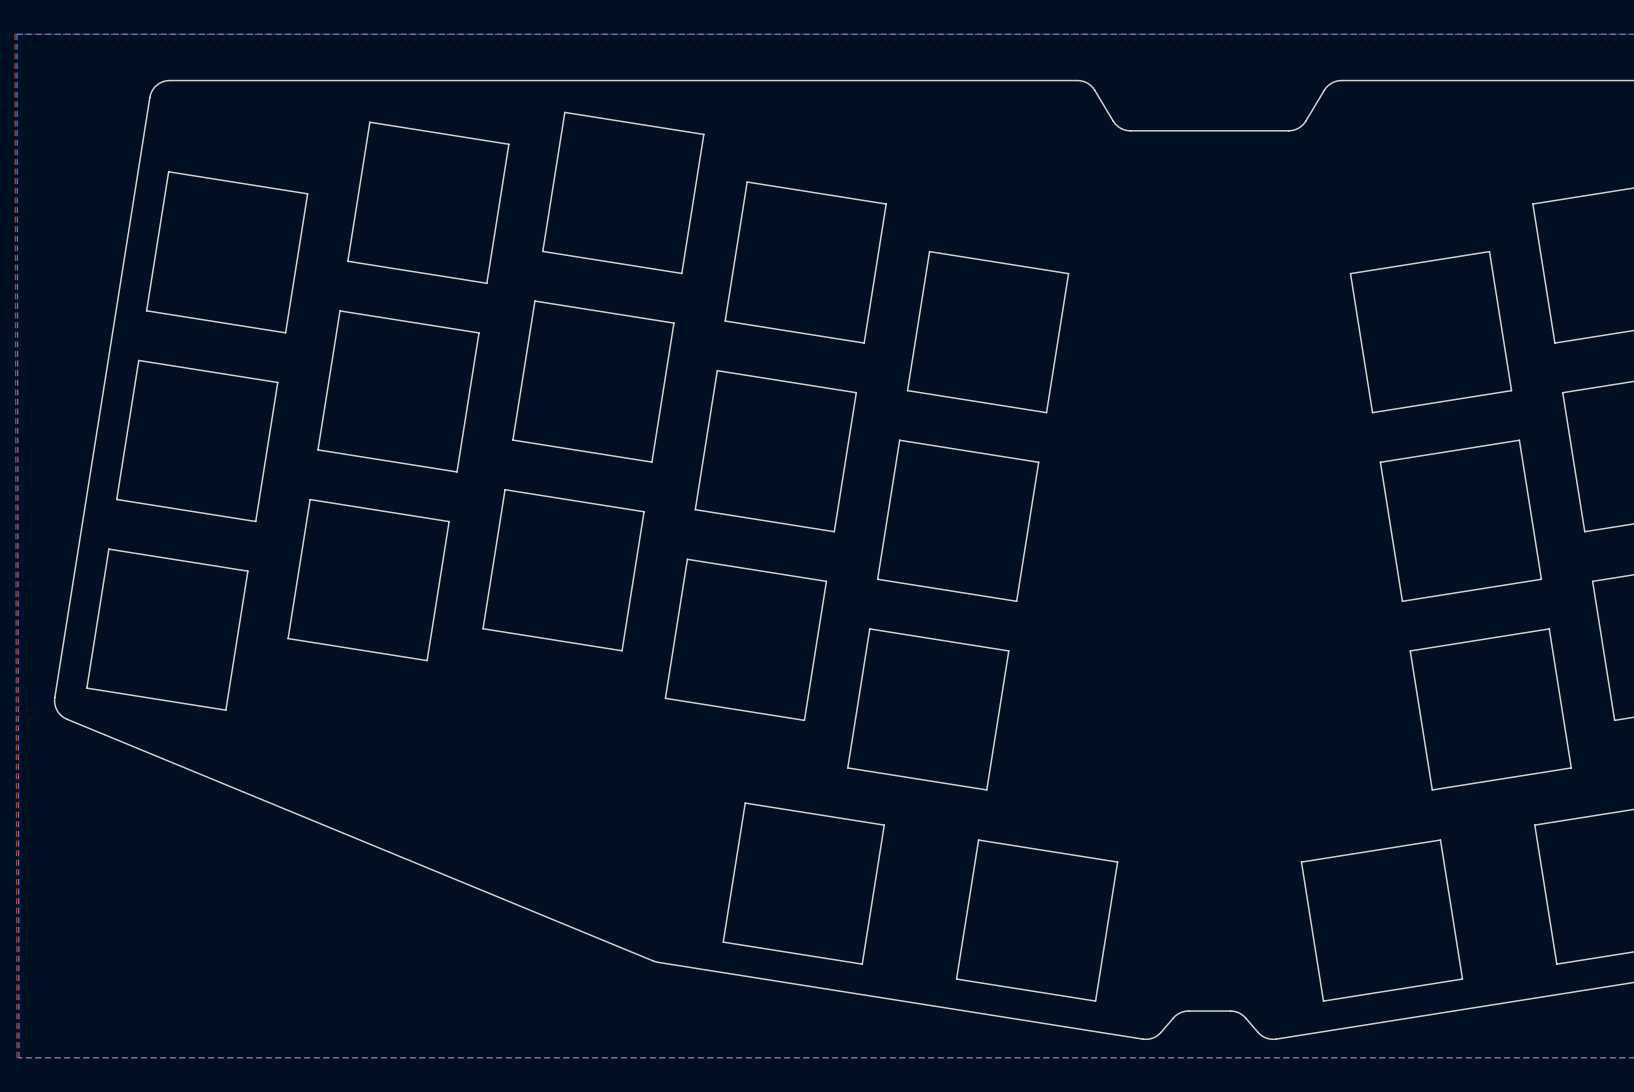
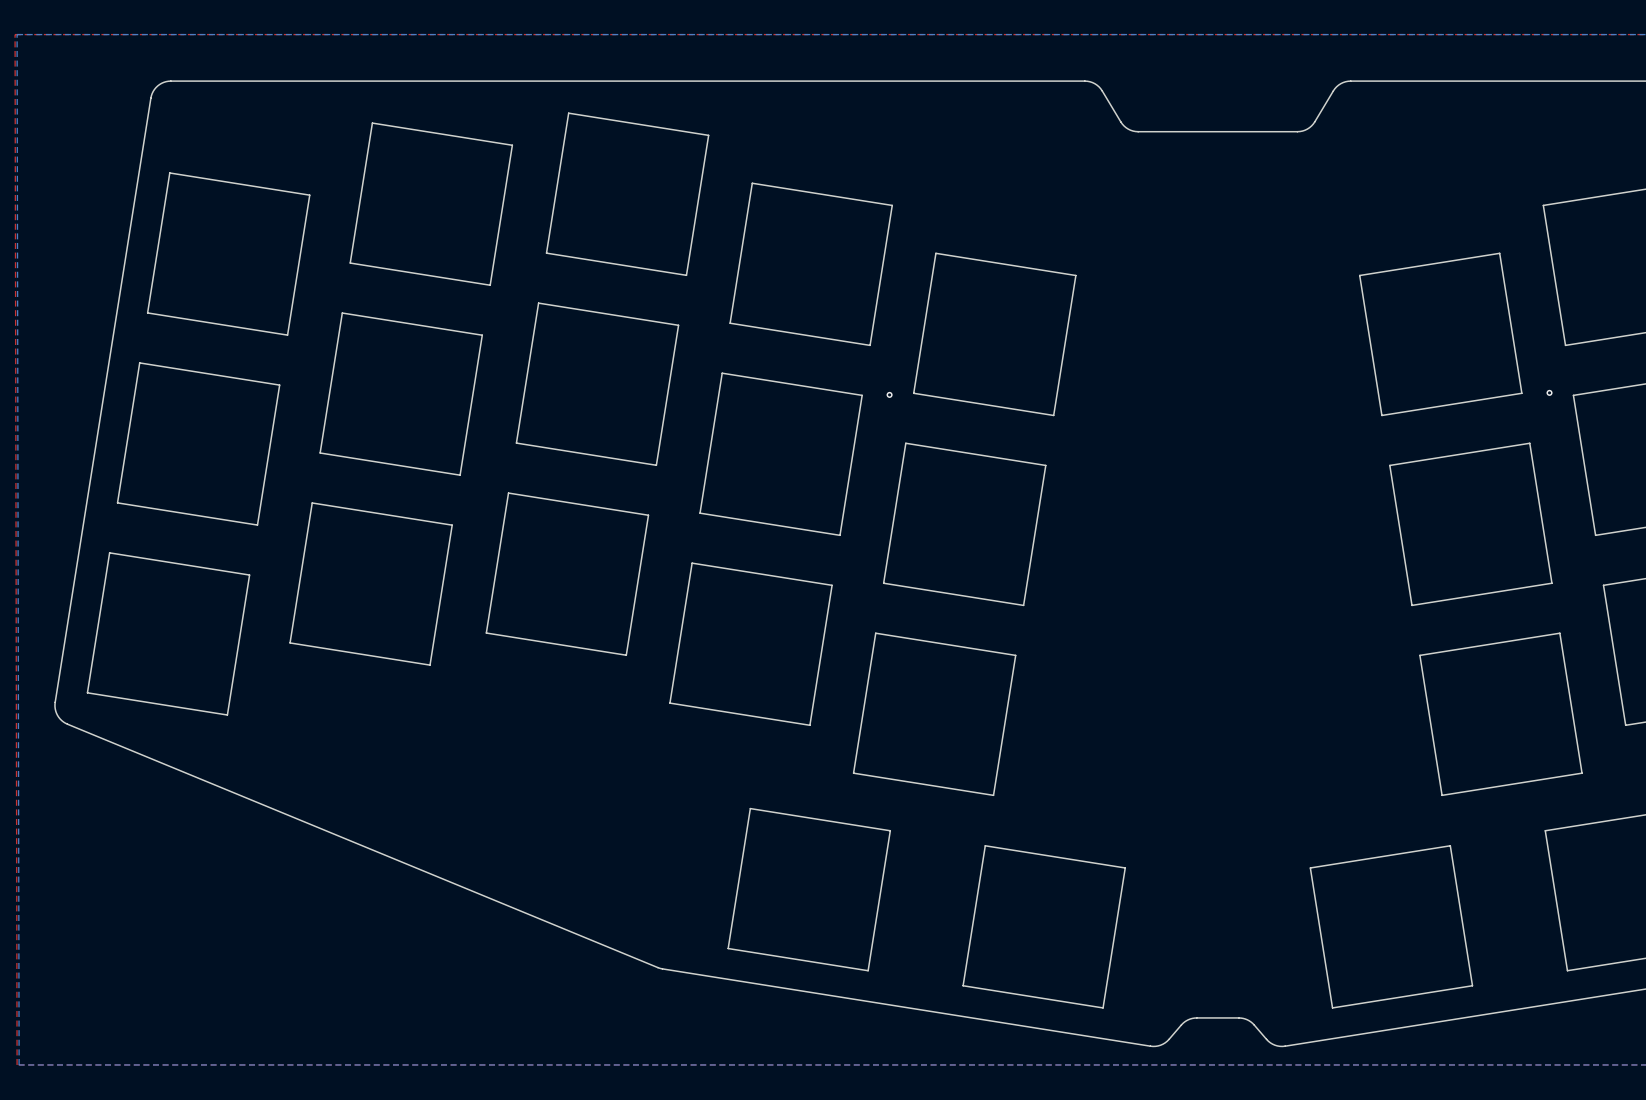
via: none -> (1549, 392)
via: none -> (889, 394)

